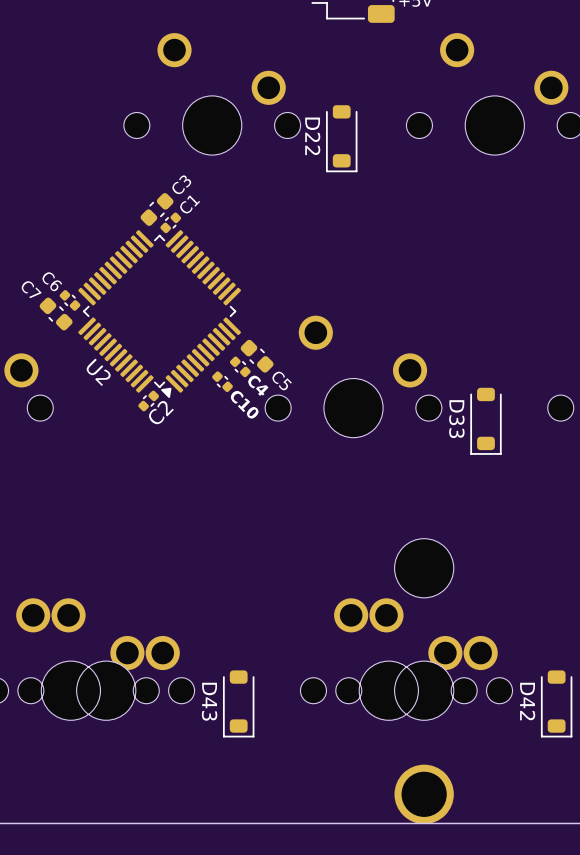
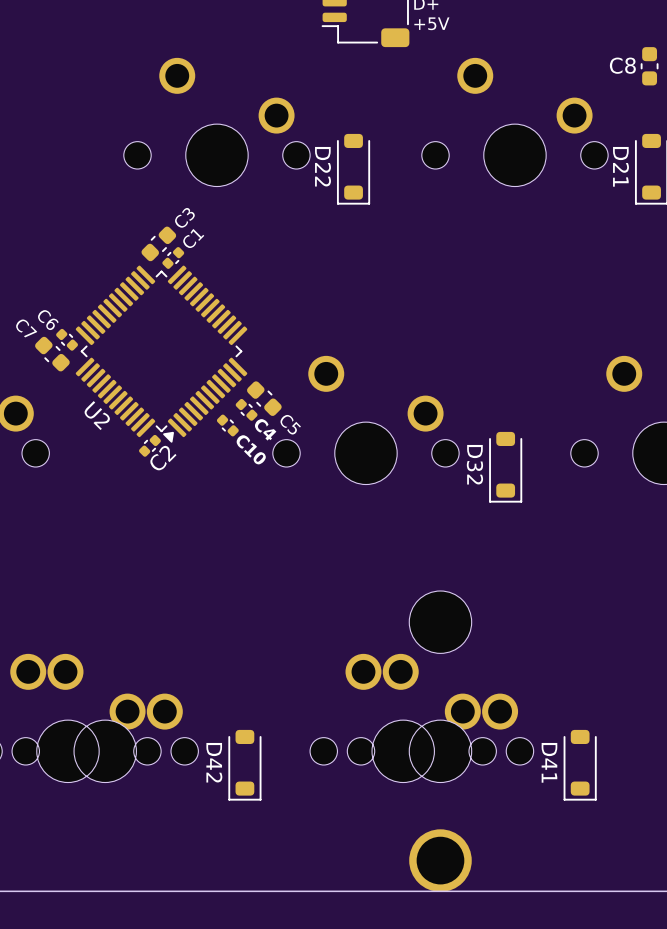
D33 name: D33 (456, 419) -> D32 (474, 464)
D43 name: D43 (209, 701) -> D42 (214, 762)
D42 name: D42 (527, 701) -> D41 (549, 762)

